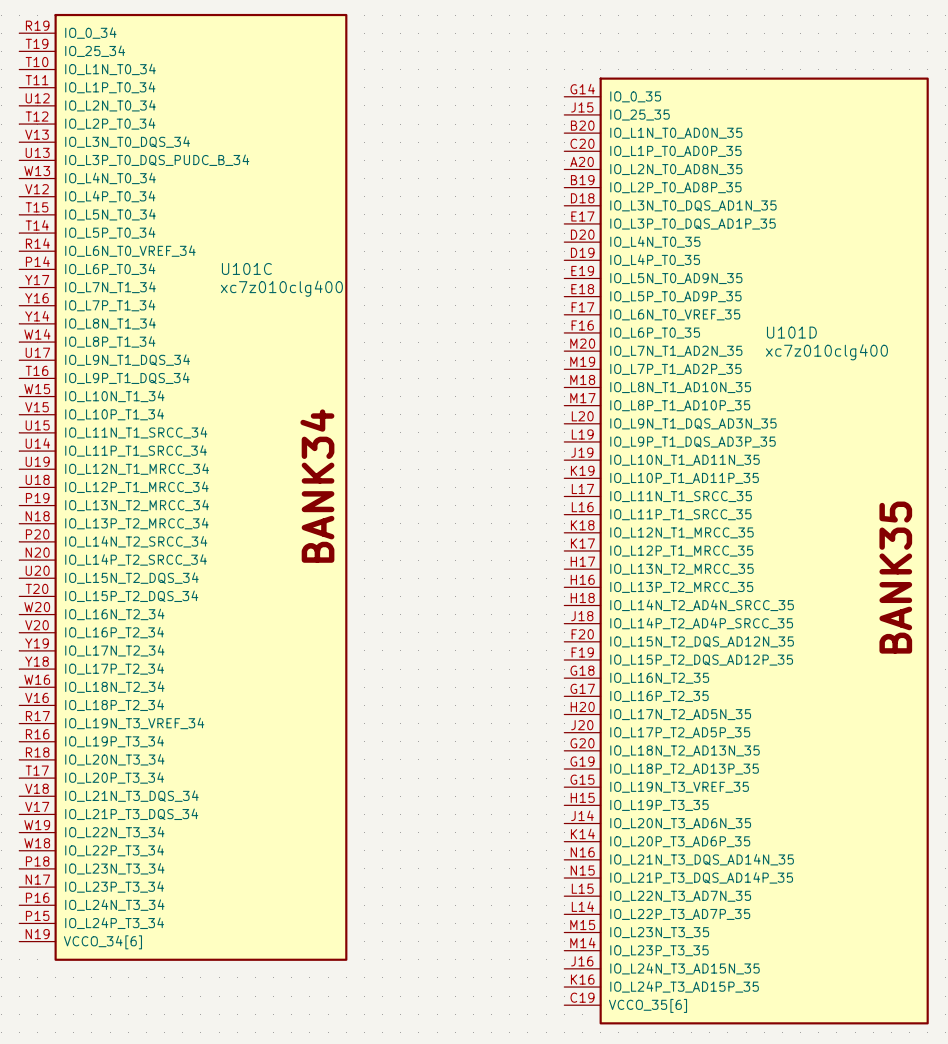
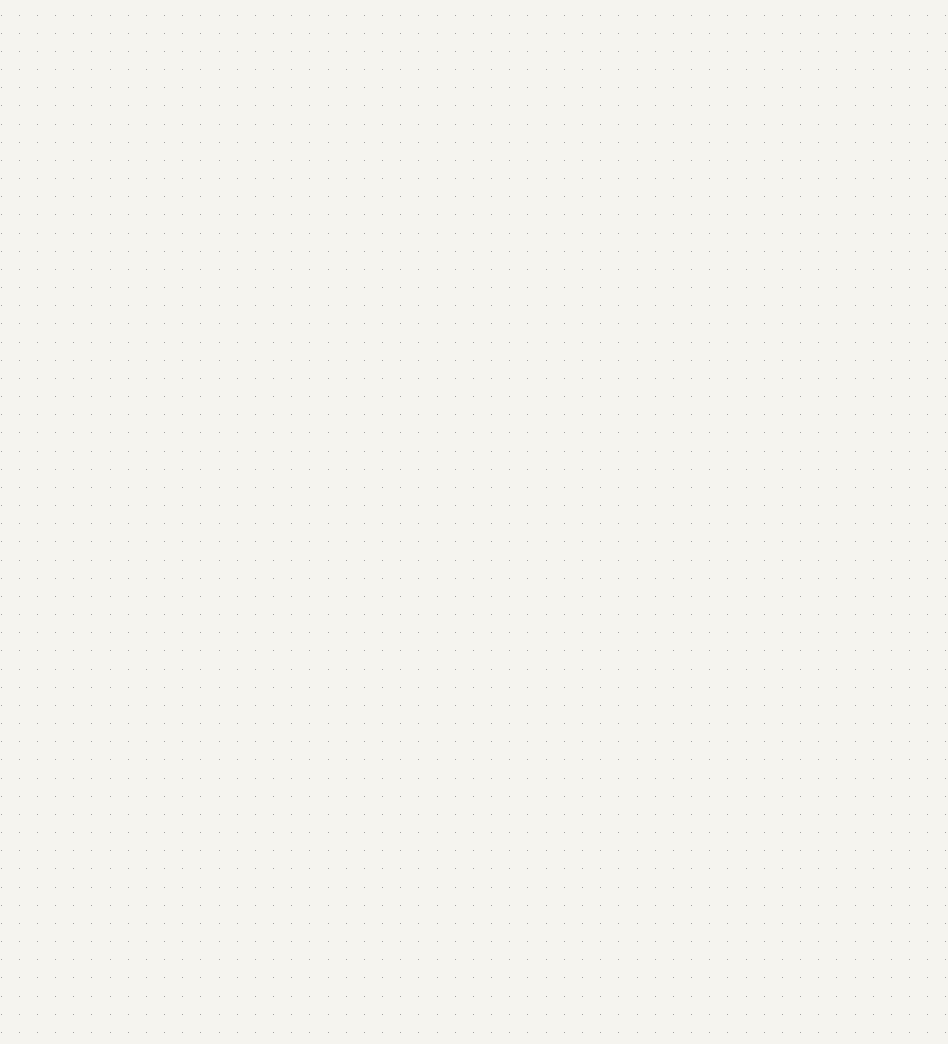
U101C: xc7z010clg400 (183, 487) -> none
U101D: xc7z010clg400 (746, 550) -> none

